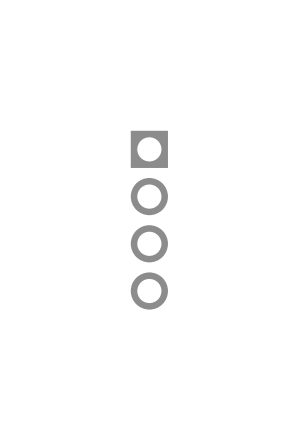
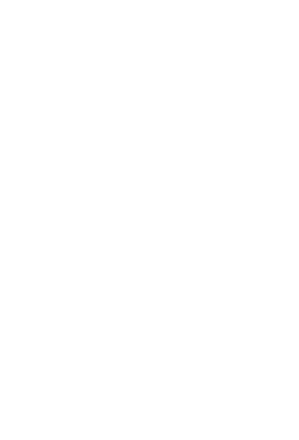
part: (149, 220) -> none

